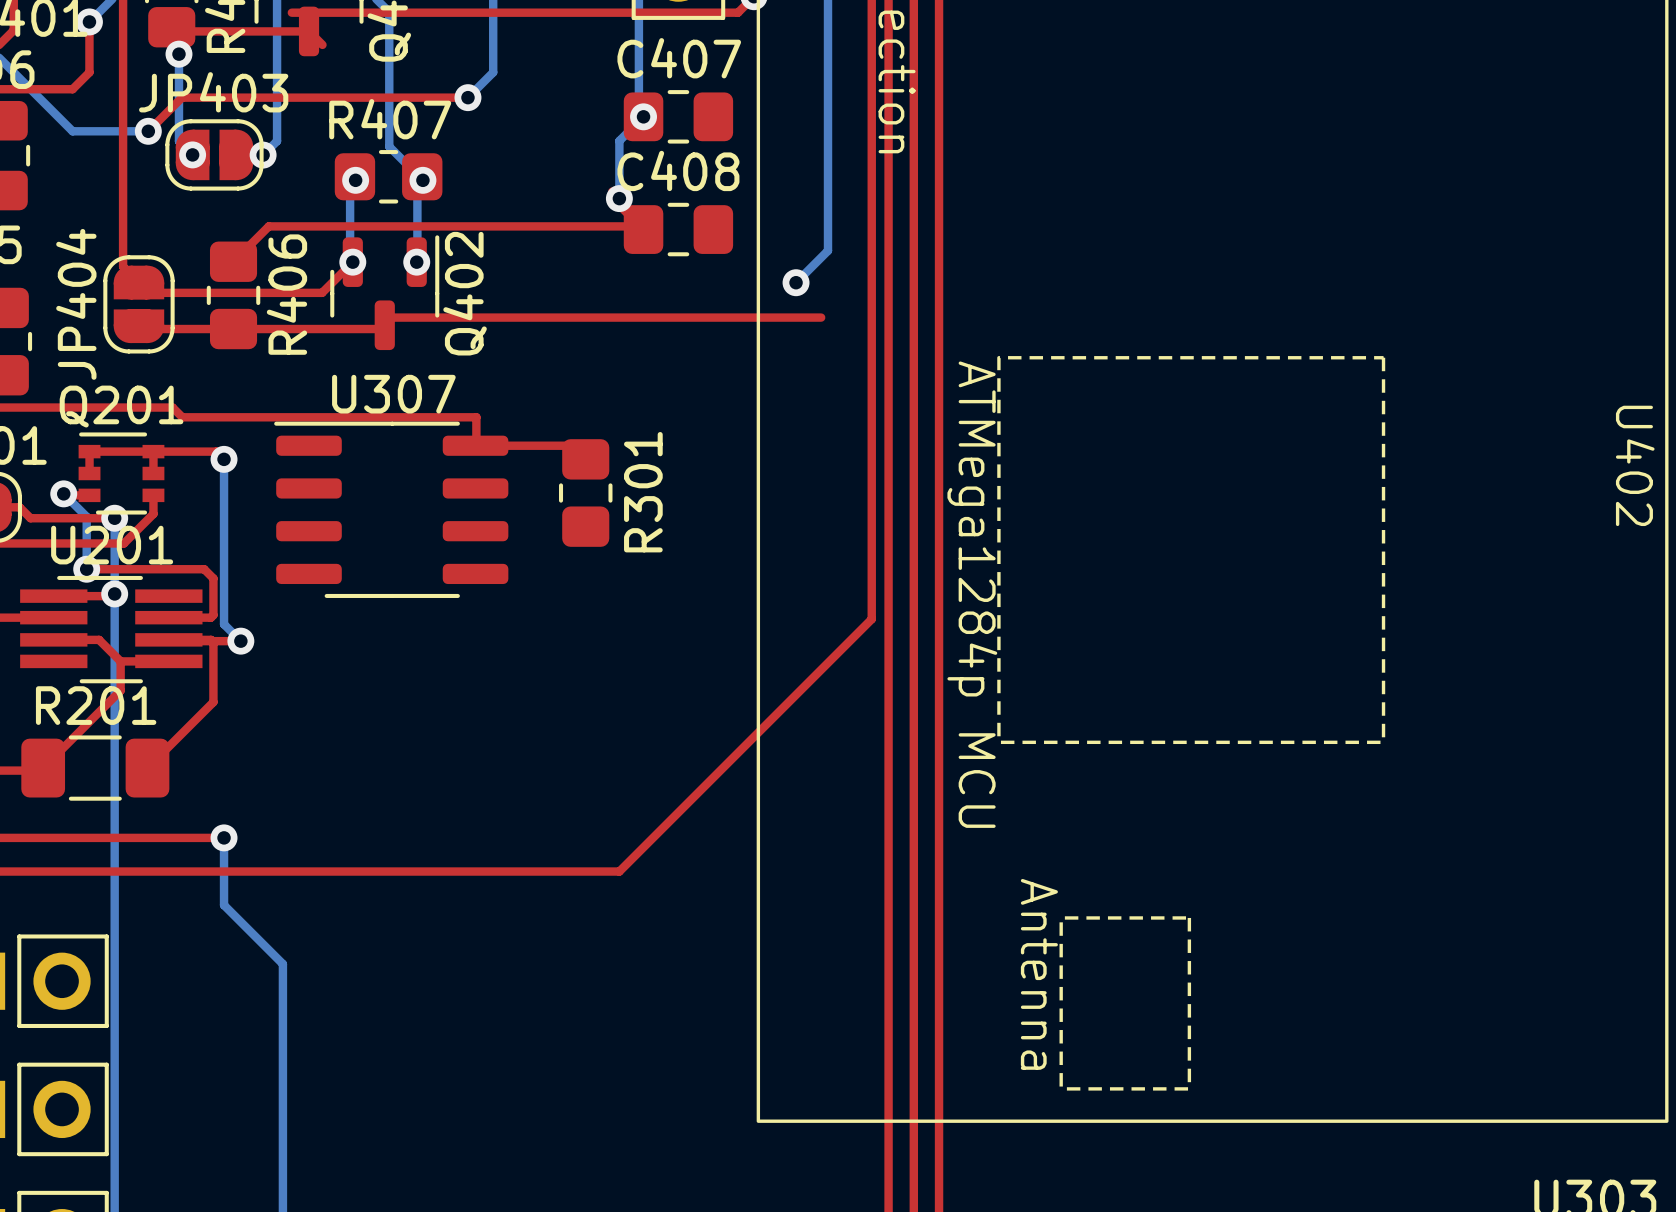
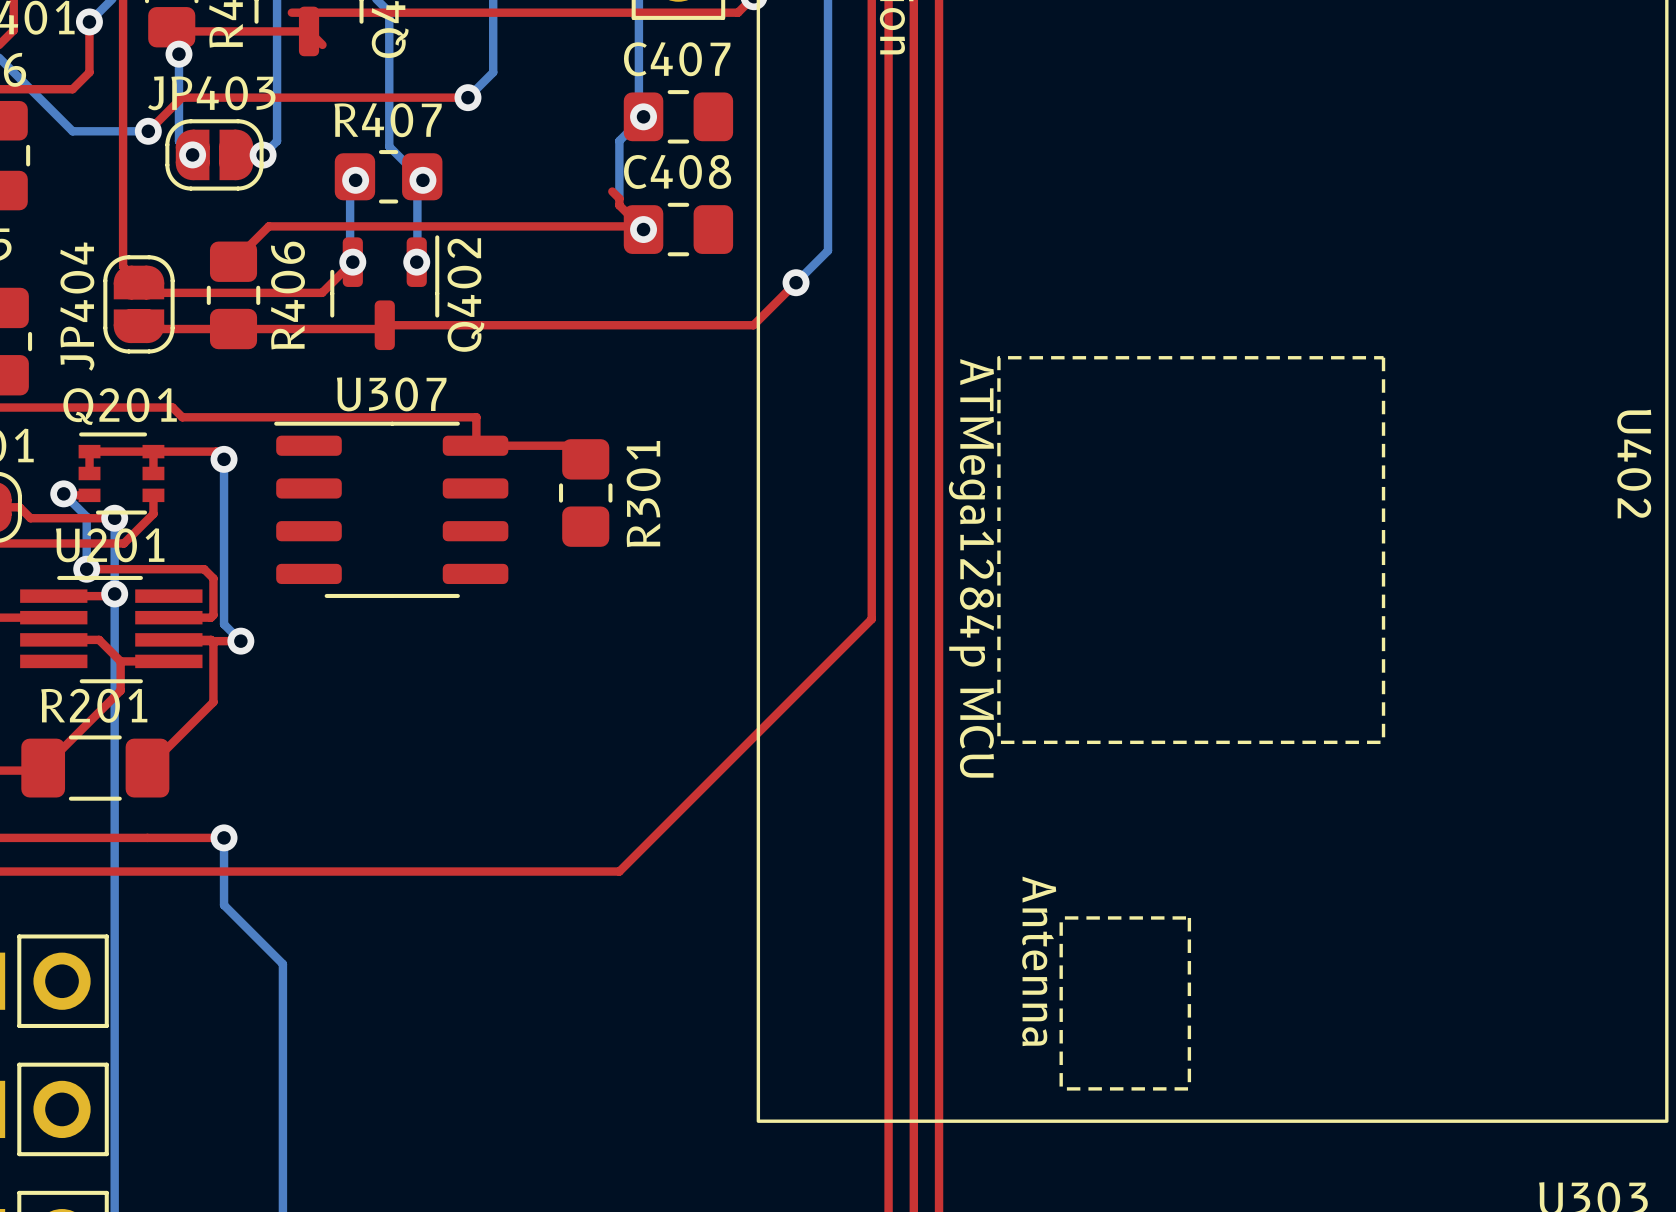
via position: (619, 198) -> (643, 229)
top track: none -> (796, 282) (753, 325) (384, 325)
top track: (821, 317) (392, 317) (380, 329) -> none

